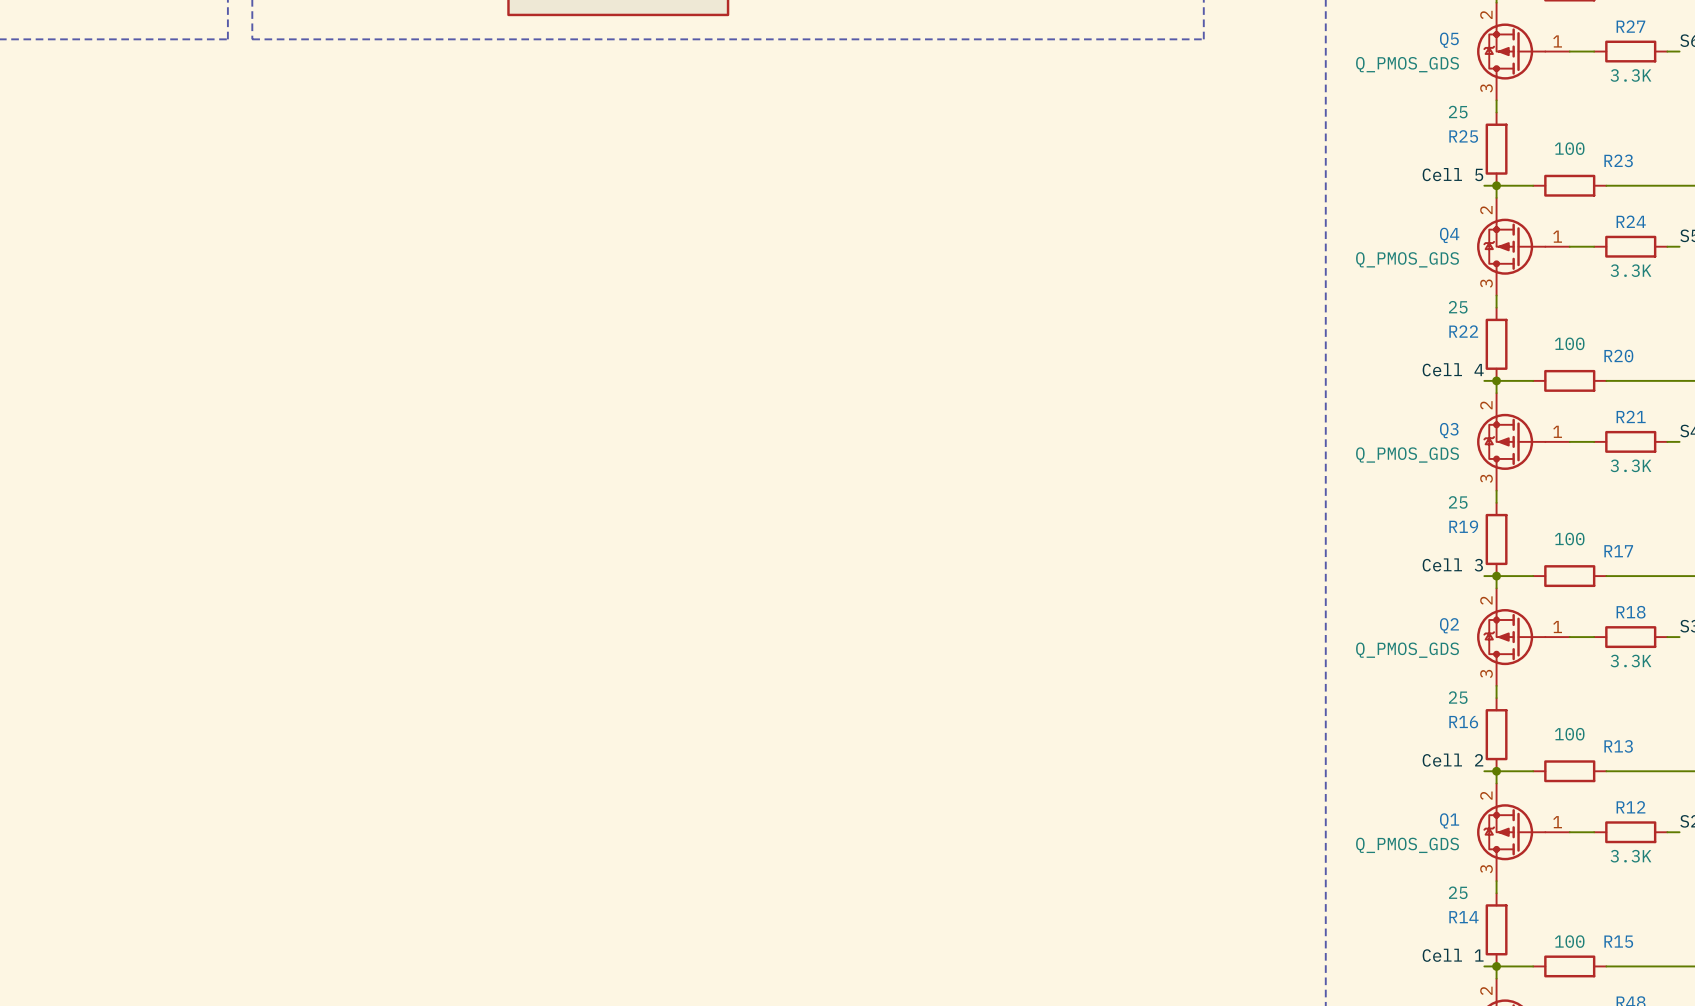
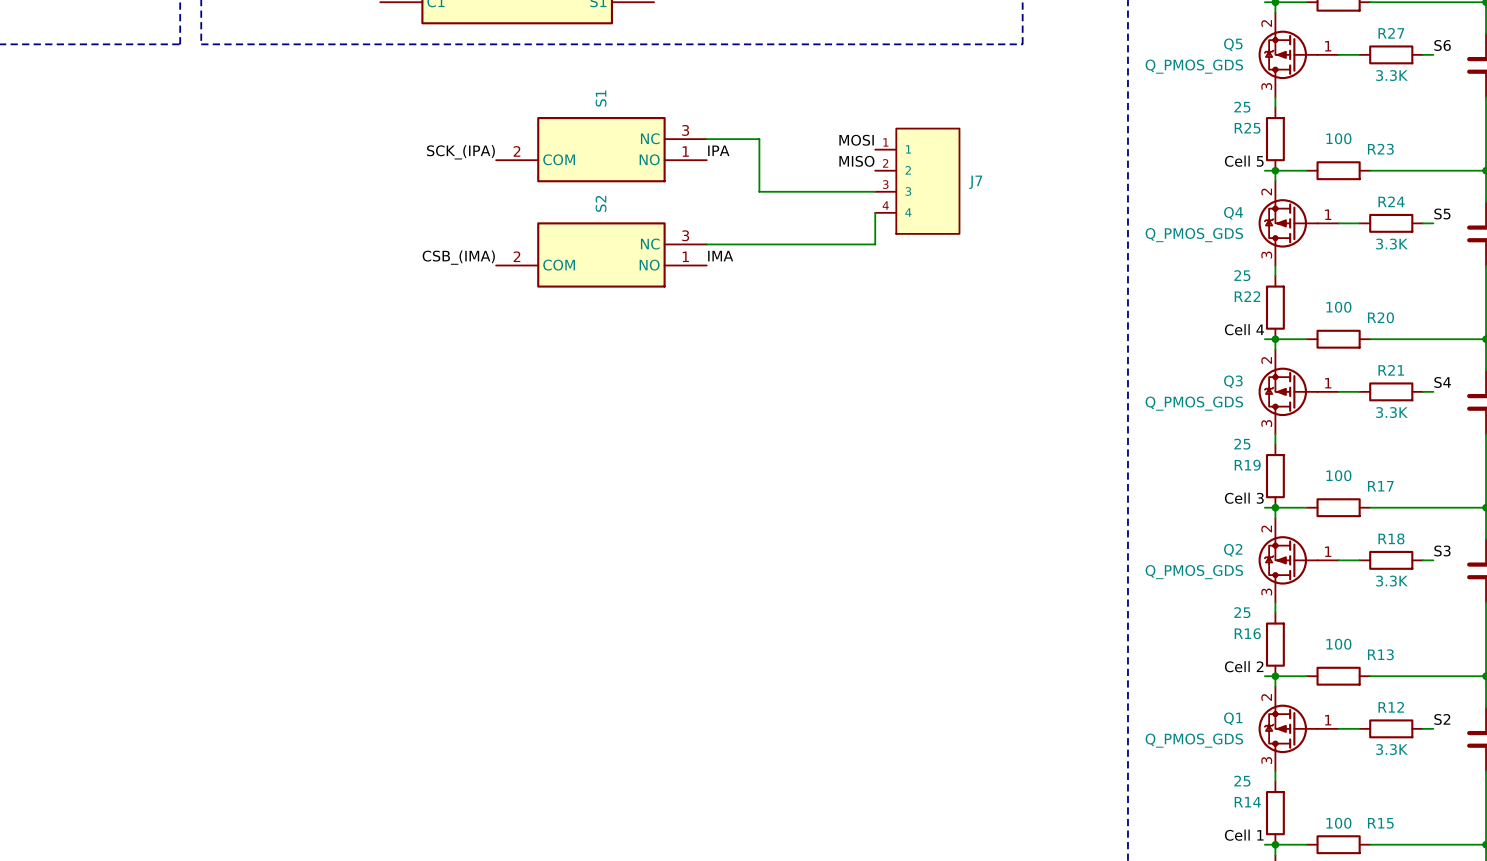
wire: none -> (706, 139) (759, 139) (759, 191) (875, 191)
label: none -> MOSI (856, 140)
S1: none -> (601, 149)
label: none -> IPA (718, 150)
label: none -> SCK_(IPA) (460, 152)
label: none -> MISO (856, 161)
J7: none -> (917, 181)
wire: none -> (875, 212) (875, 244) (706, 244)
S2: none -> (601, 254)
label: none -> IMA (720, 256)
label: none -> CSB_(IMA) (458, 257)

